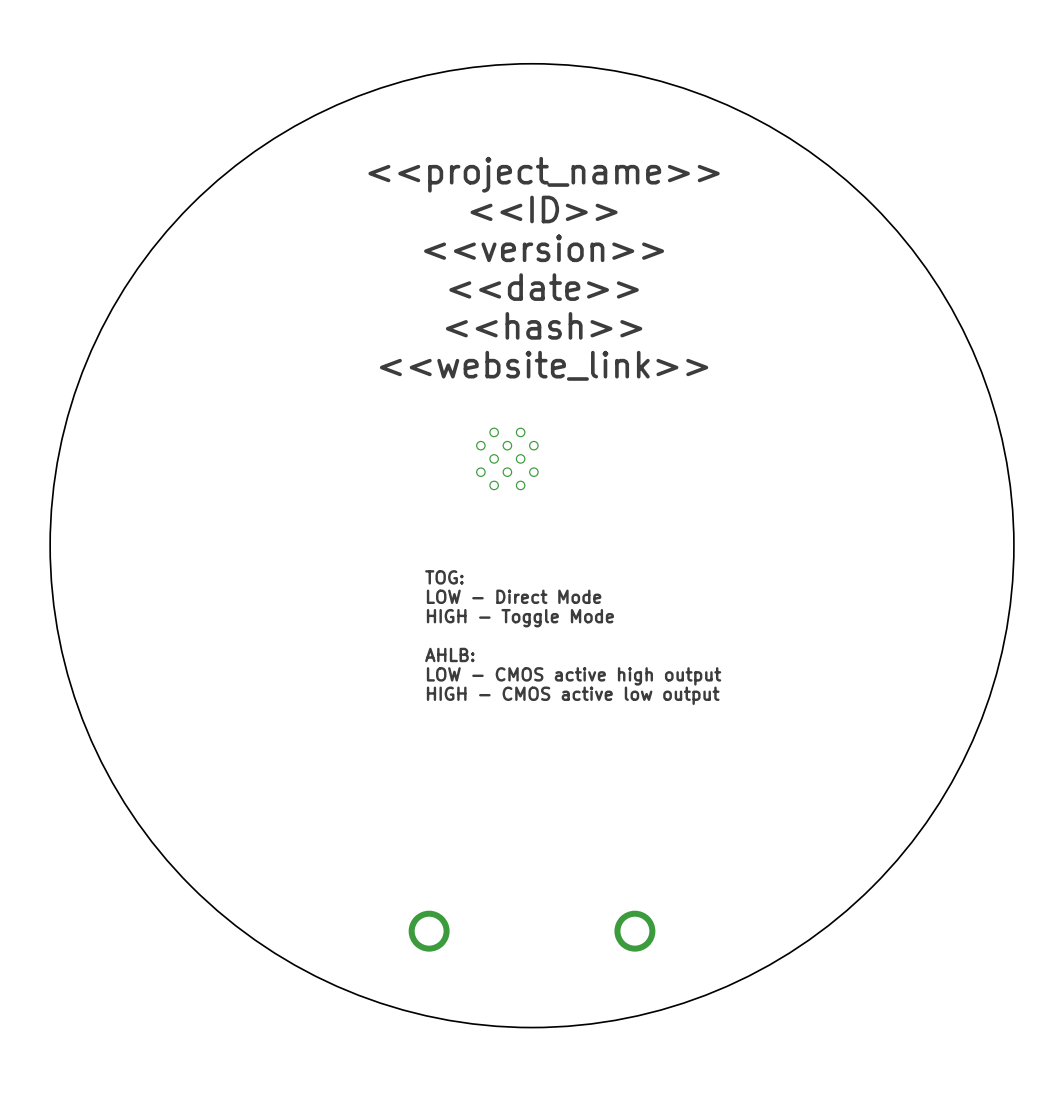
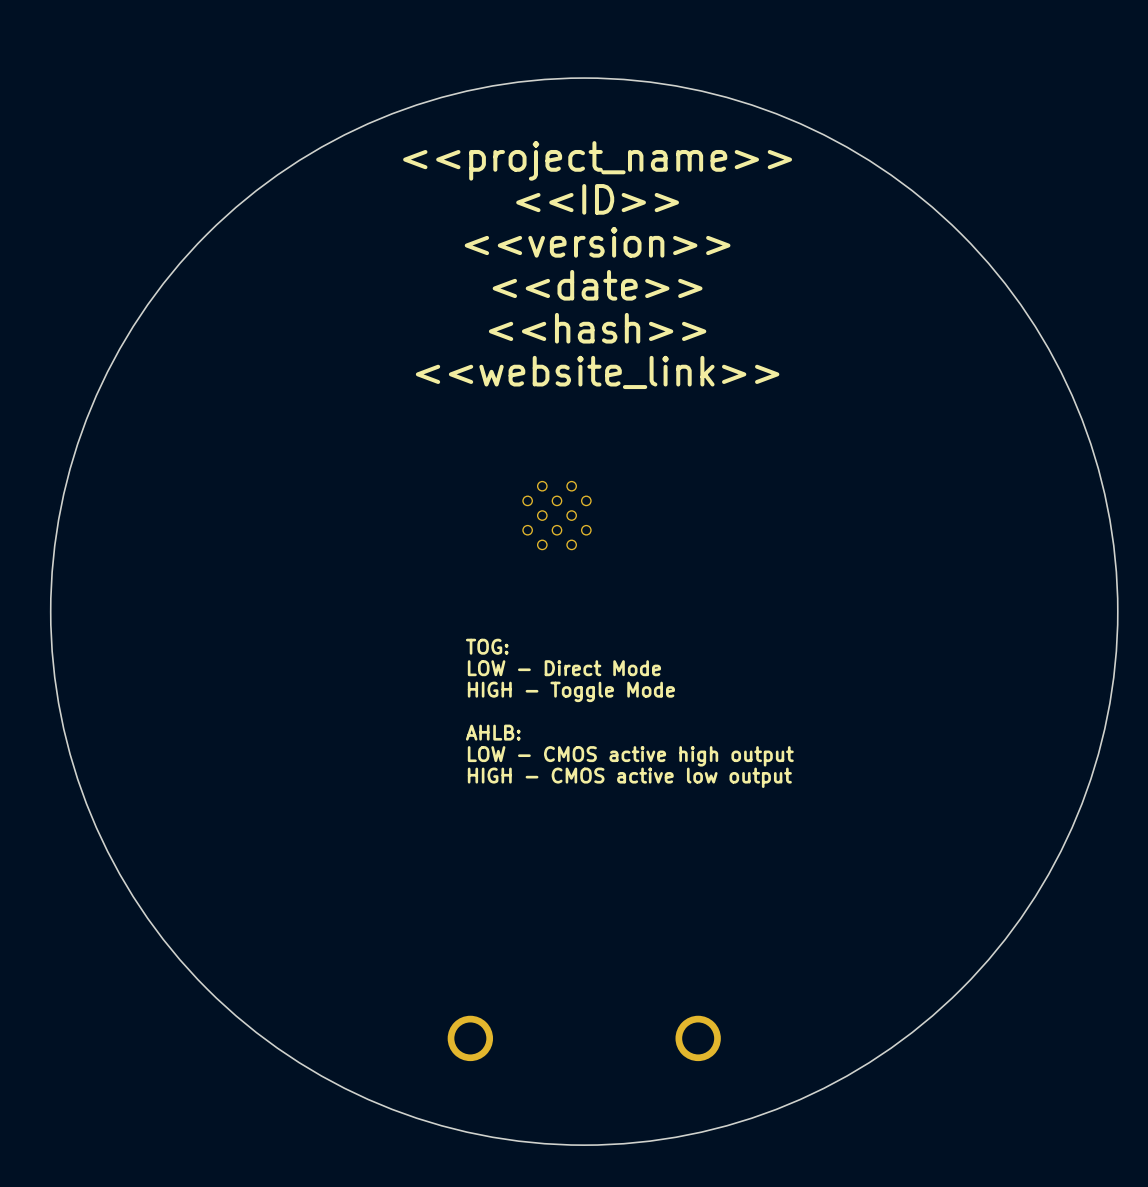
text position: <<project_name>> (544, 174) -> <<project_name>> (597, 160)
text position: <<ID>> (544, 209) -> <<ID>> (597, 199)
text position: <<version>> (544, 248) -> <<version>> (597, 242)
text position: <<date>> (544, 287) -> <<date>> (597, 285)
text position: <<hash>> (544, 325) -> <<hash>> (597, 328)
text position: <<website_link>> (544, 365) -> <<website_link>> (597, 372)

